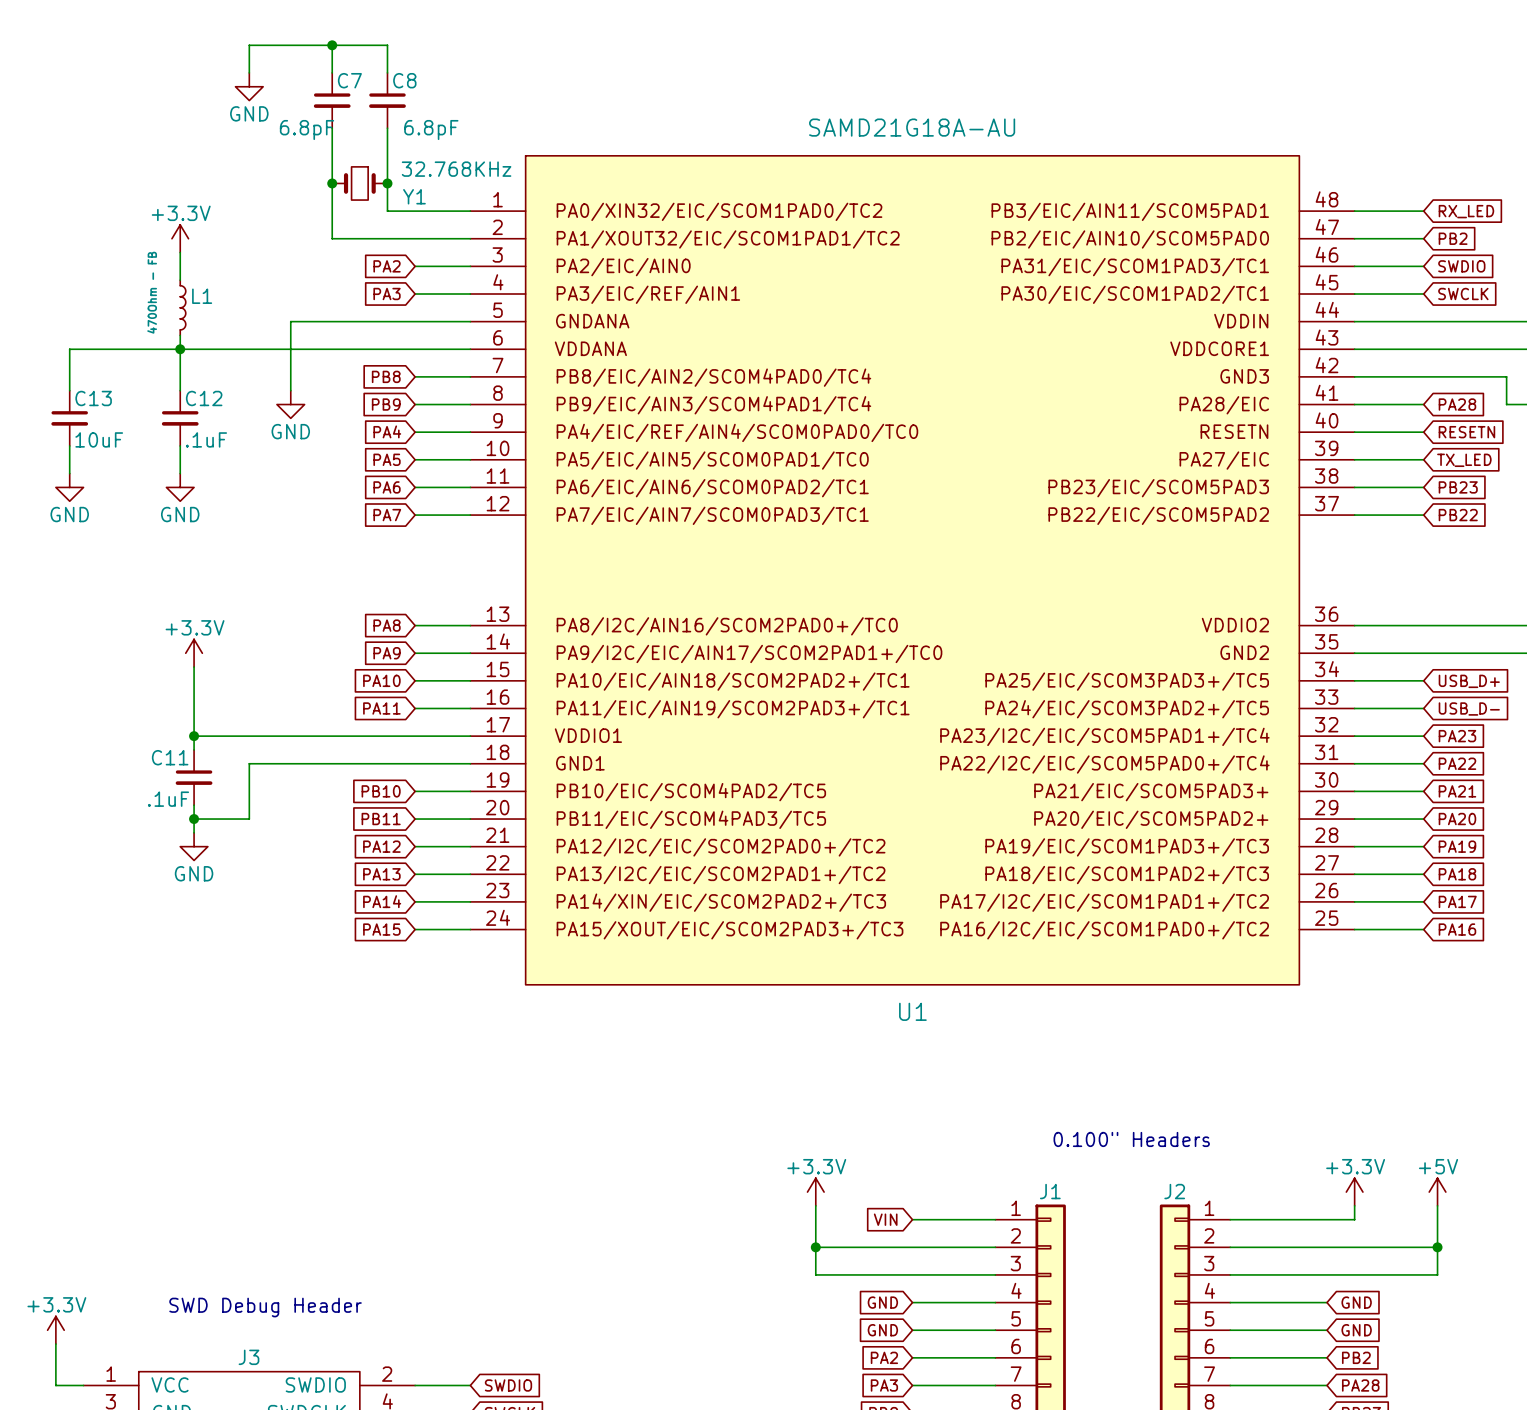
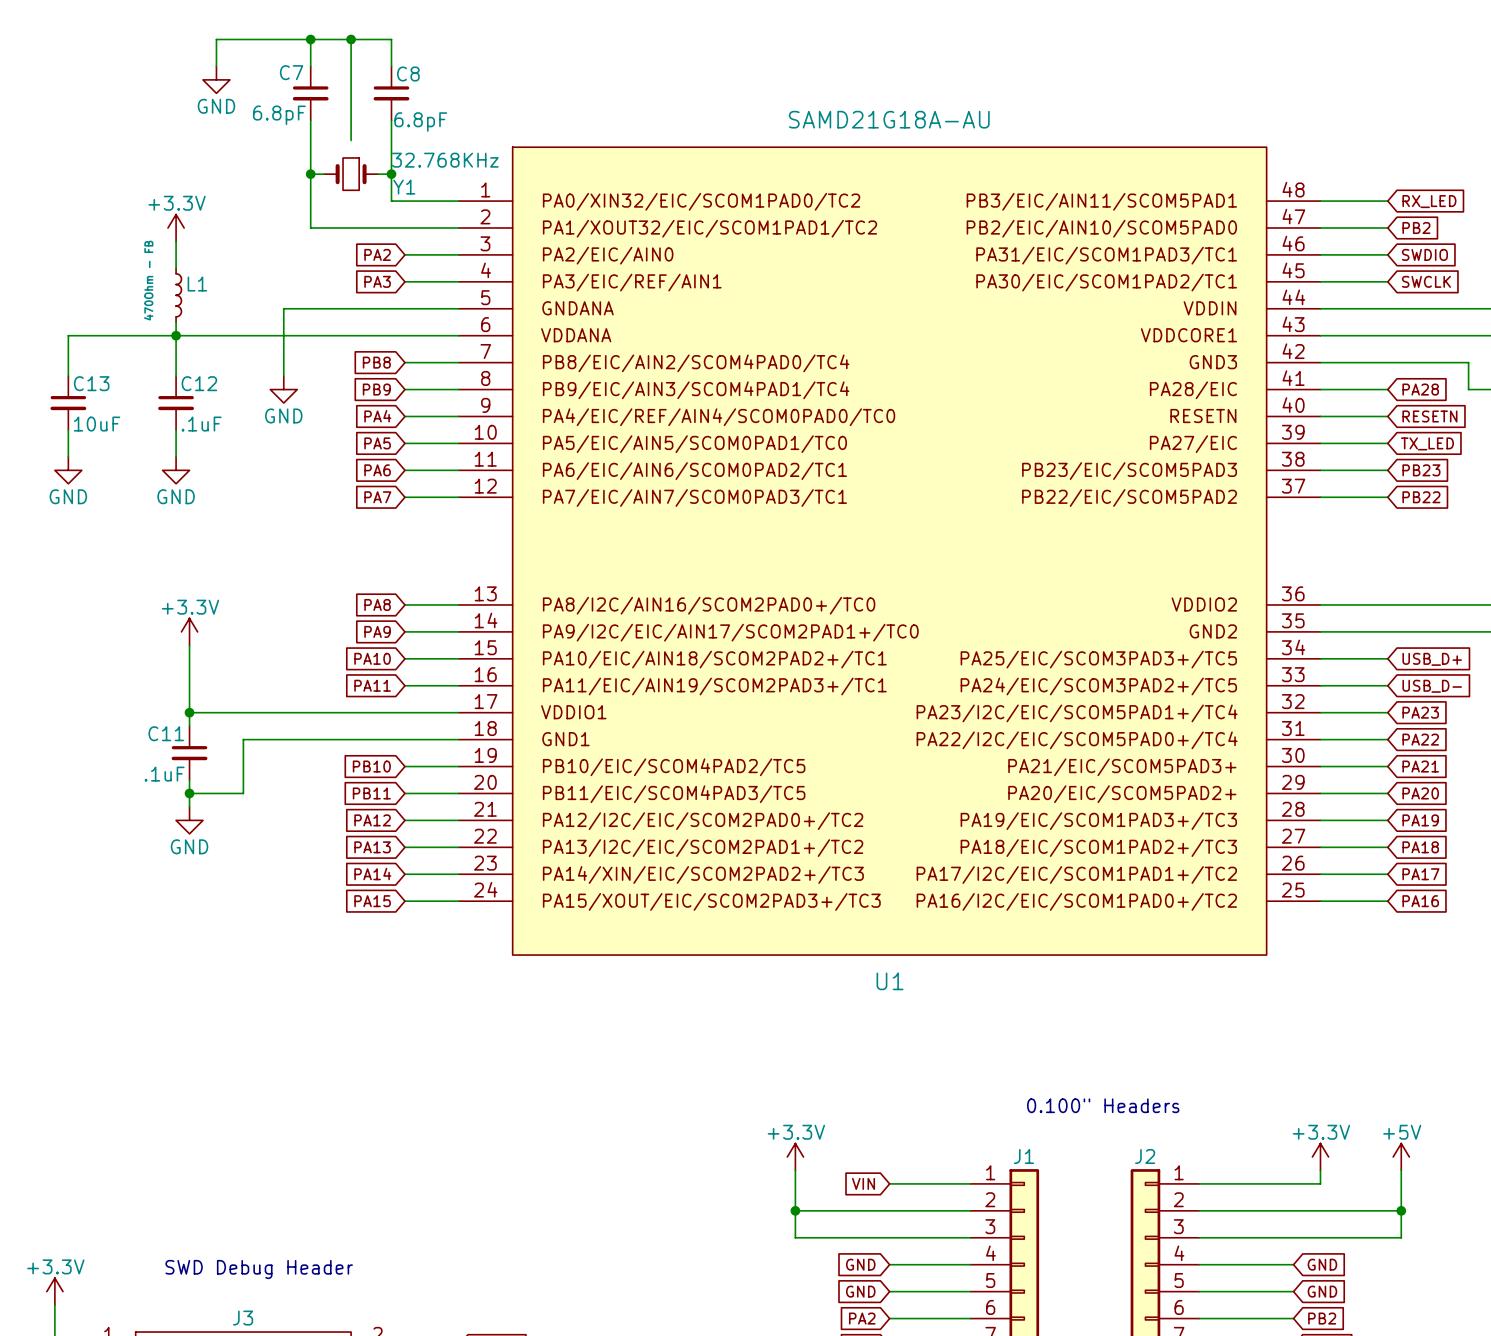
wire: (249, 45) (249, 72) -> (243, 39) (216, 39) (216, 66)
junction: none -> (310, 39)
wire: (332, 45) (332, 72) -> (310, 39) (310, 66)
junction: (332, 45) -> none
wire: none -> (351, 39) (351, 140)
junction: none -> (351, 39)
wire: (387, 45) (387, 72) -> (378, 39) (391, 39) (391, 66)
C7 name position: C7 (349, 80) -> C7 (291, 72)
power symbol position: GND (249, 86) -> GND (216, 79)
C7 position: (332, 100) -> (310, 93)
C8 position: (387, 100) -> (391, 93)
wire: (332, 128) (332, 238) -> (310, 120) (310, 227) (324, 227)
wire: (387, 128) (387, 211) (401, 211) -> (391, 120) (391, 201)
C7 value position: 6.8pF (306, 129) -> 6.8pF (279, 115)
wire: none -> (310, 174) (324, 174)
junction position: (332, 183) -> (310, 174)
wire: none -> (378, 174) (391, 174)
junction position: (387, 183) -> (391, 174)

